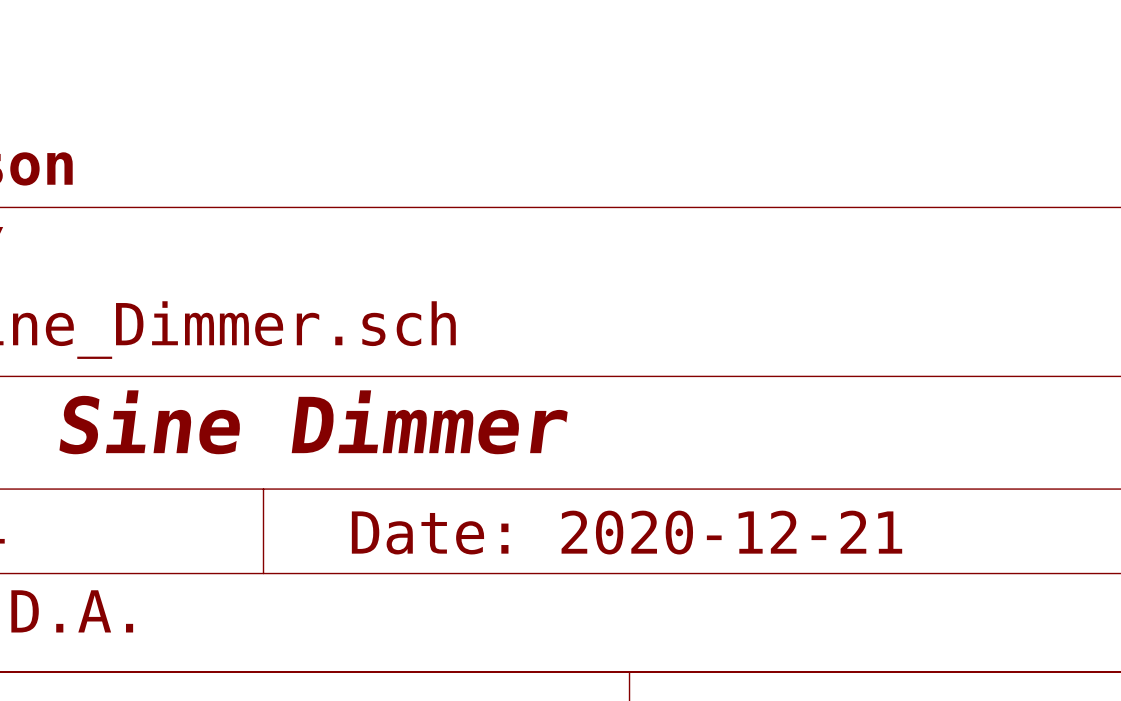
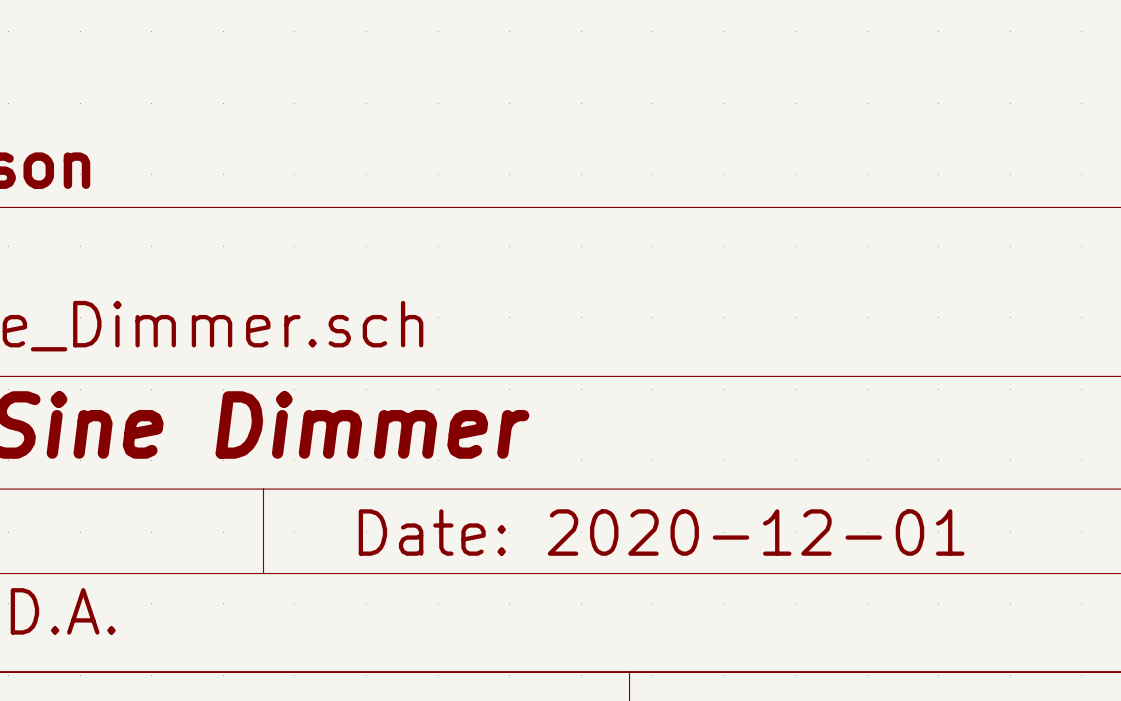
title block: Date: 2020-12-21 (627, 532) -> Date: 2020-12-01 (661, 532)

